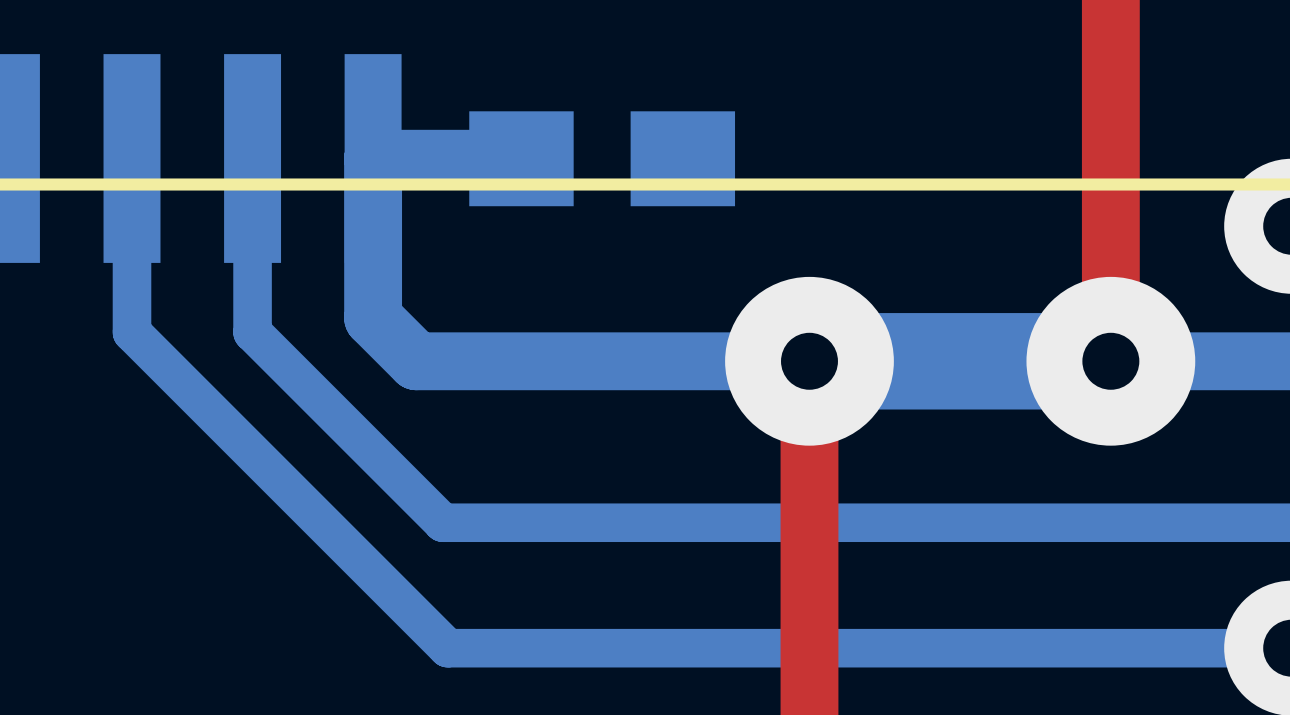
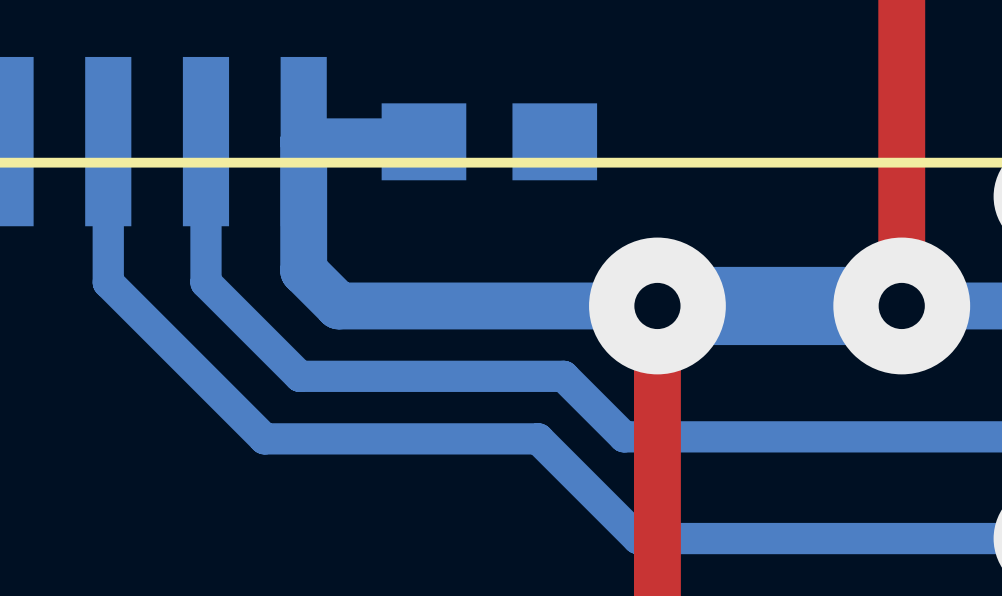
bottom track: (368, 448) (442, 522) (768, 522) -> (299, 376) (563, 376) (624, 436)
bottom track: (324, 525) (447, 648) (785, 648) -> (264, 438) (538, 438) (637, 538)

